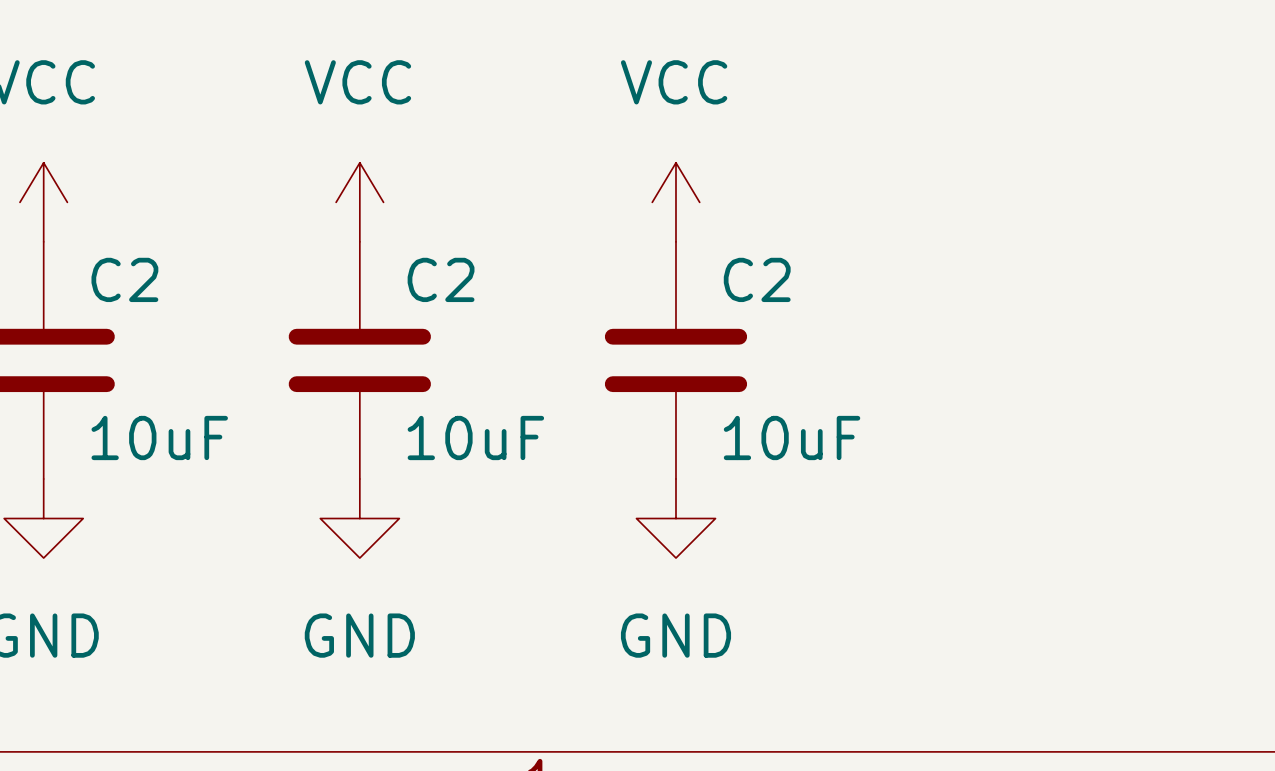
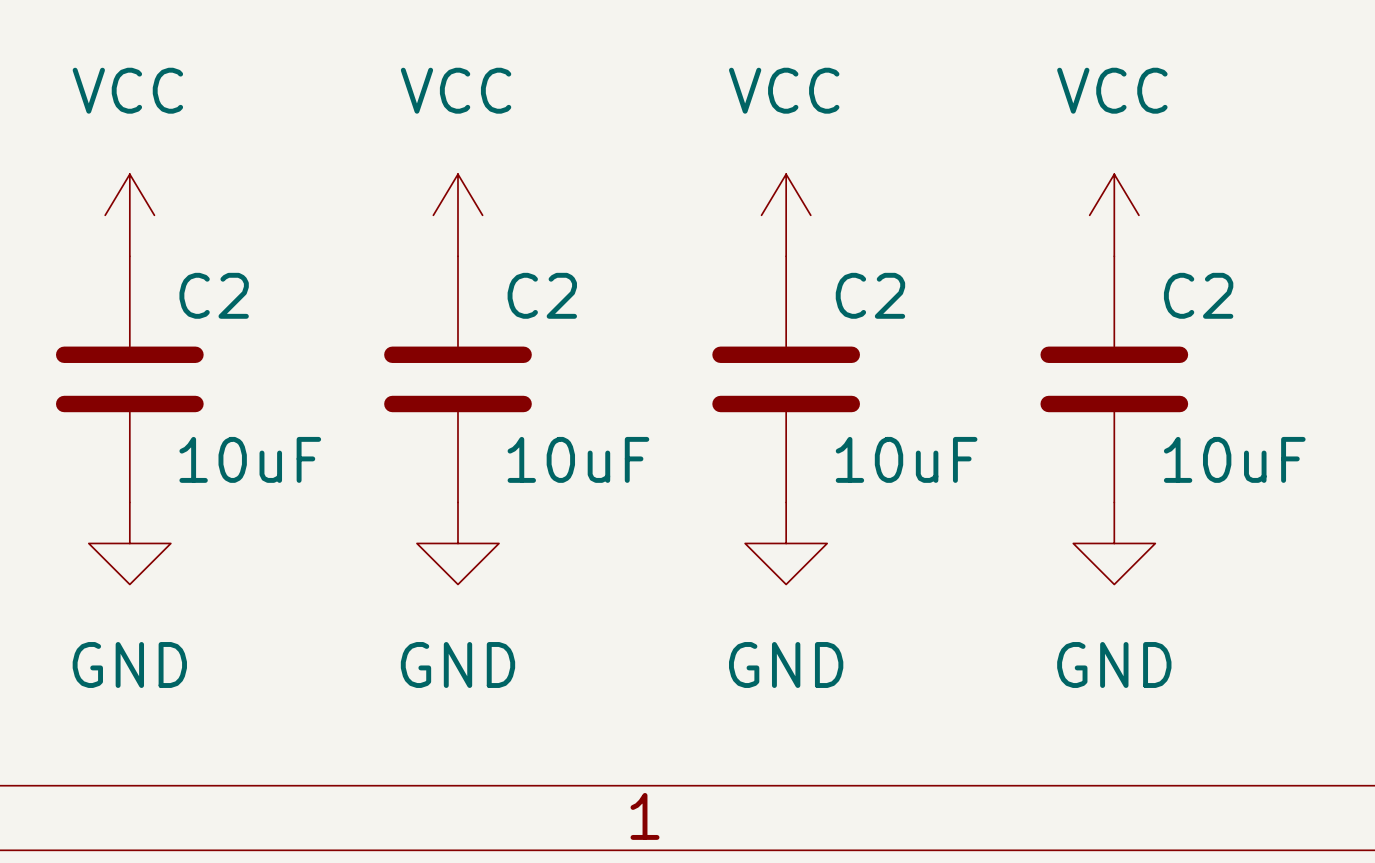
power symbol: none -> VCC (1114, 215)
C2: none -> 10uF (1114, 379)
power symbol: none -> GND (1114, 543)

